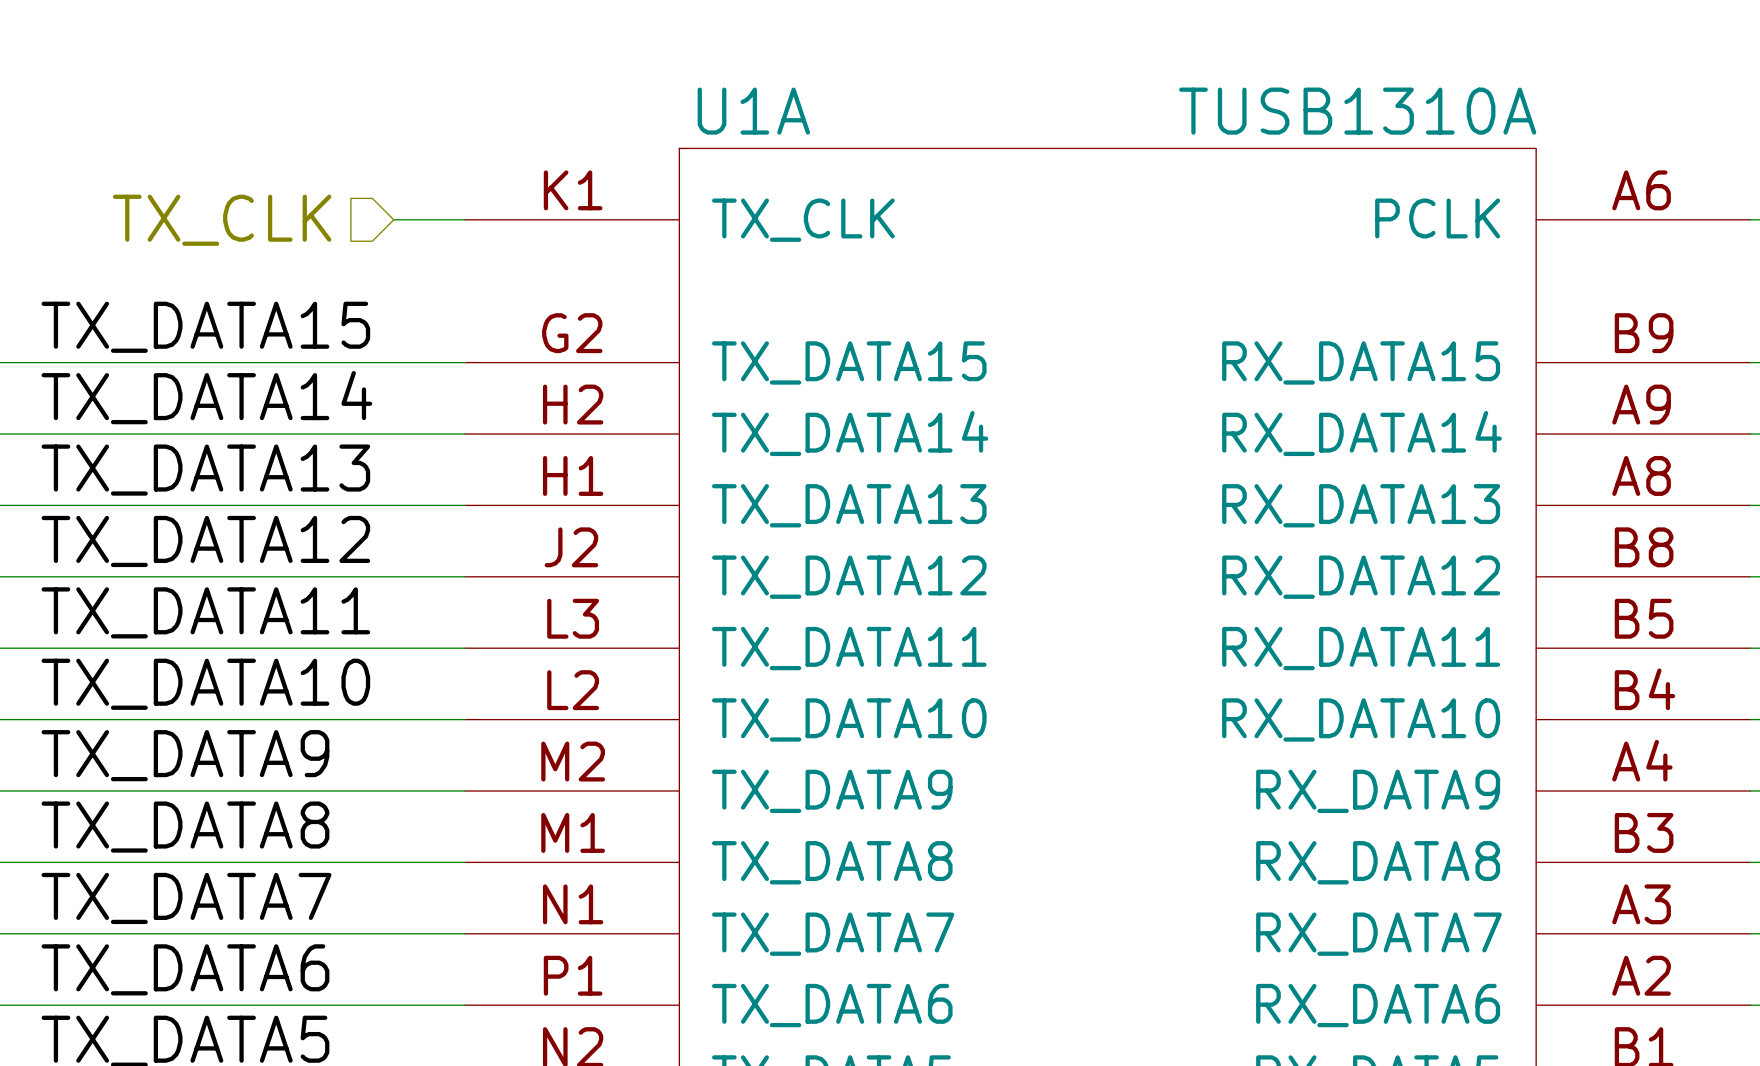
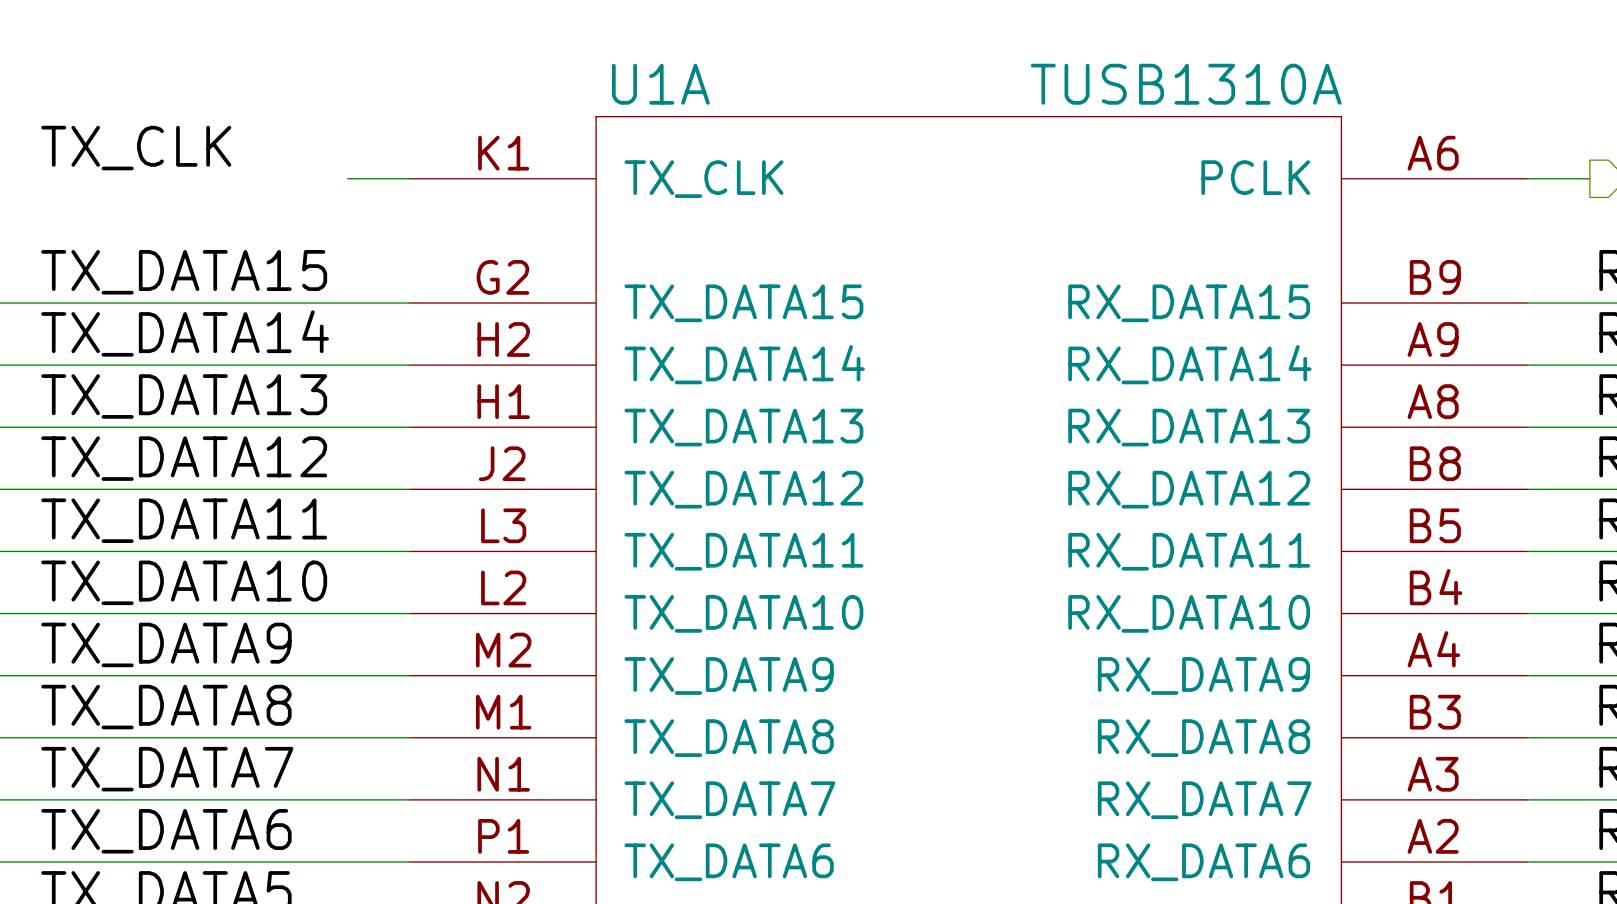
label: none -> TX_CLK (136, 148)
hierarchical label: TX_CLK (222, 220) -> none

